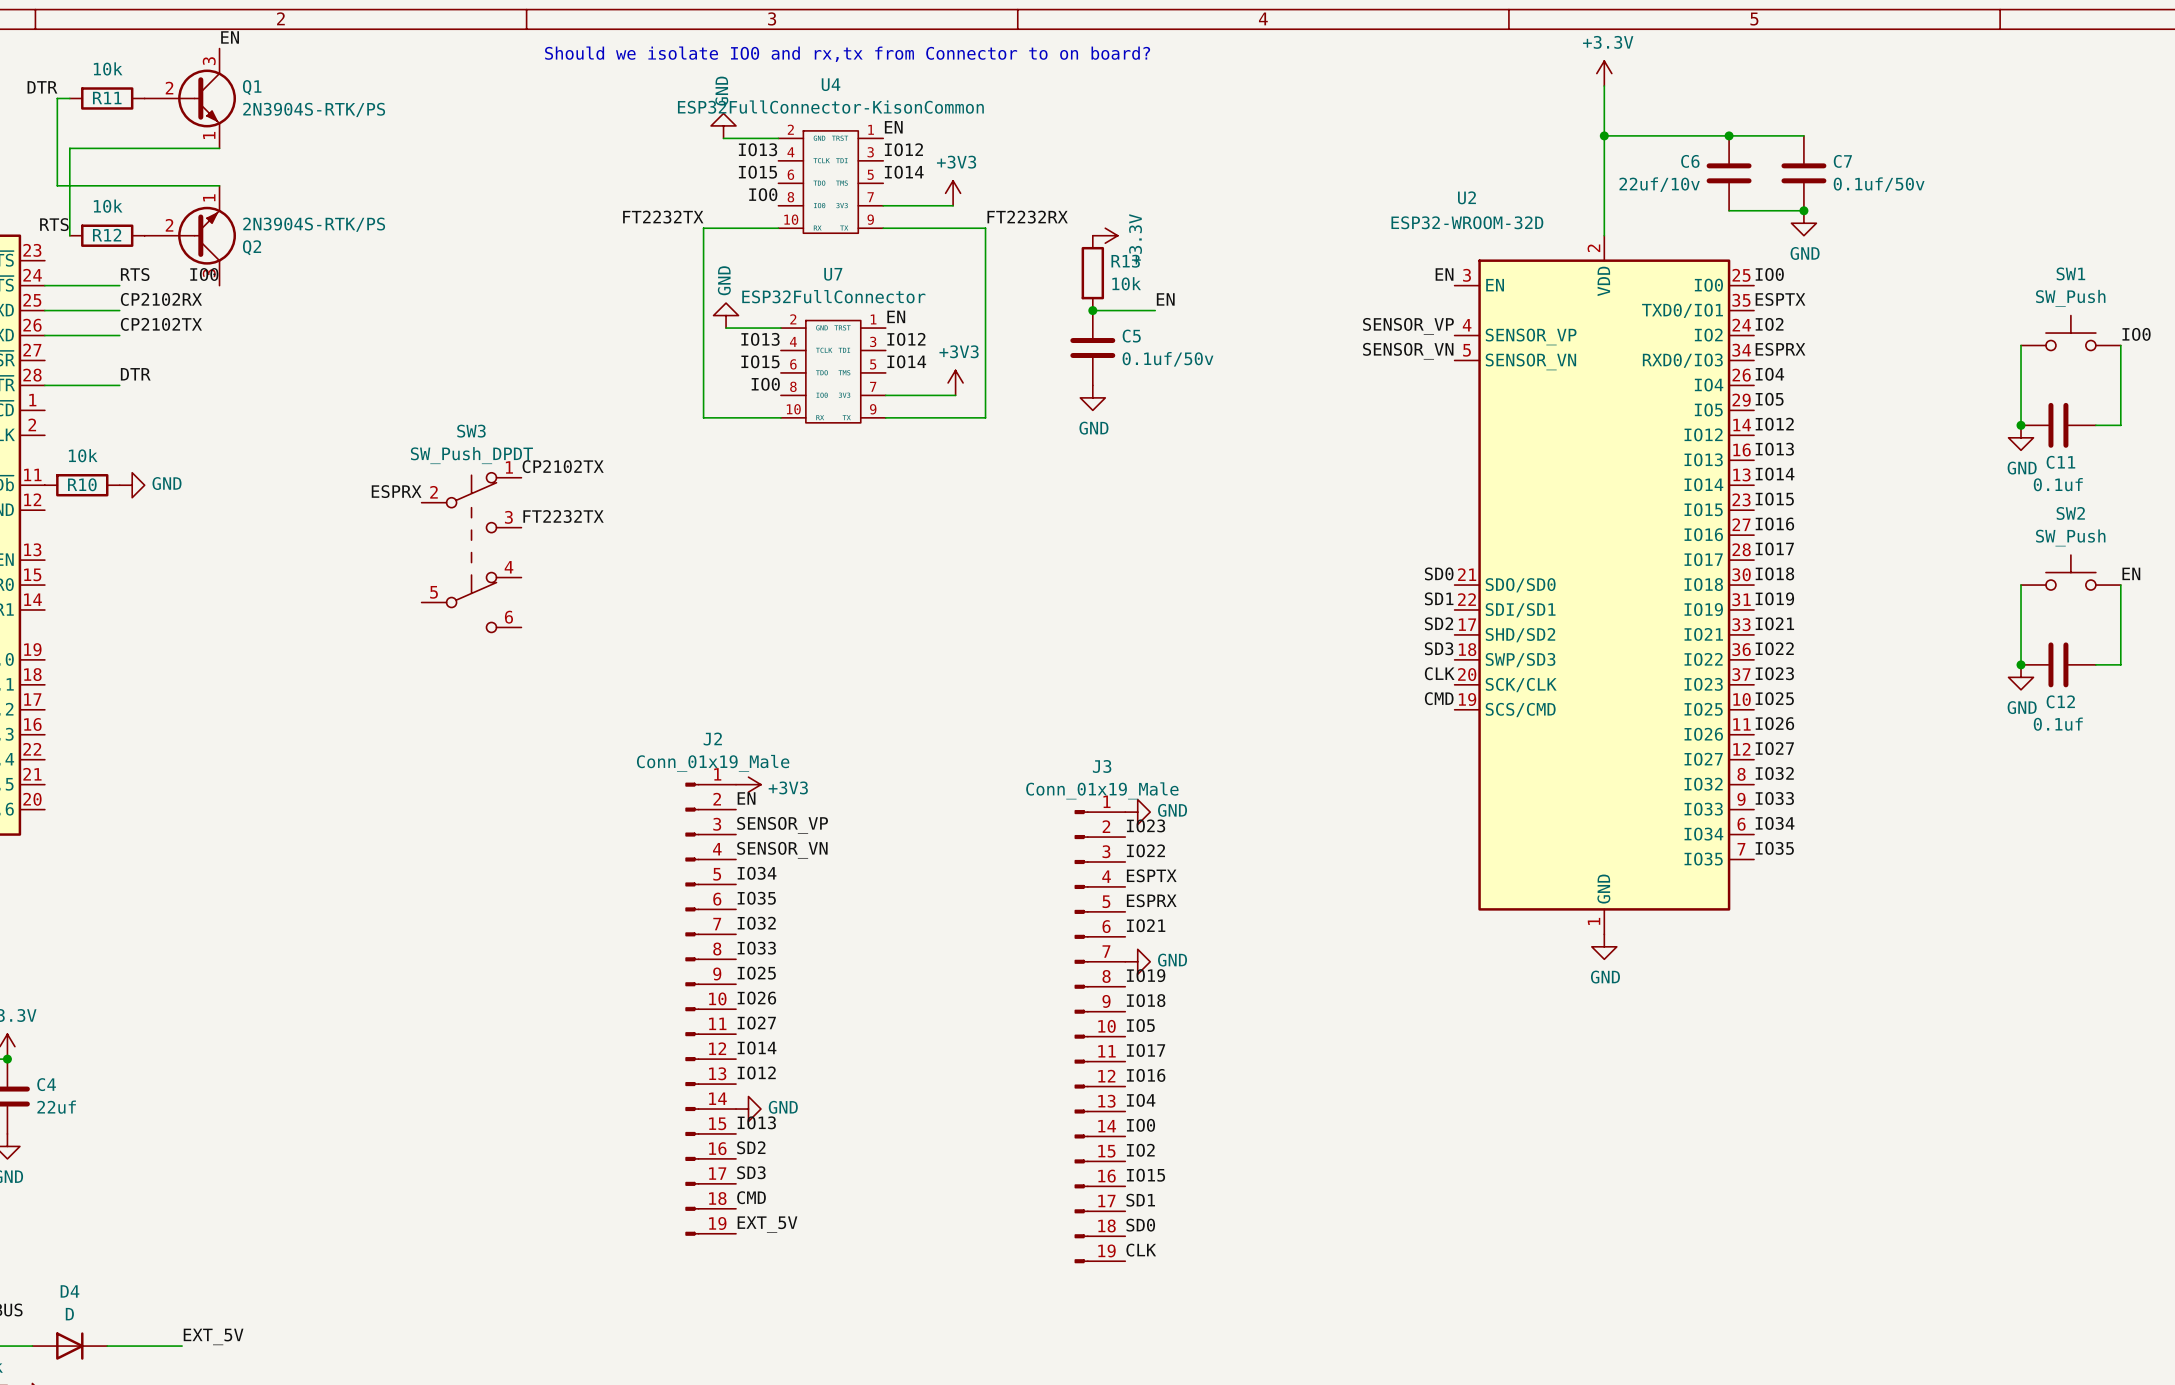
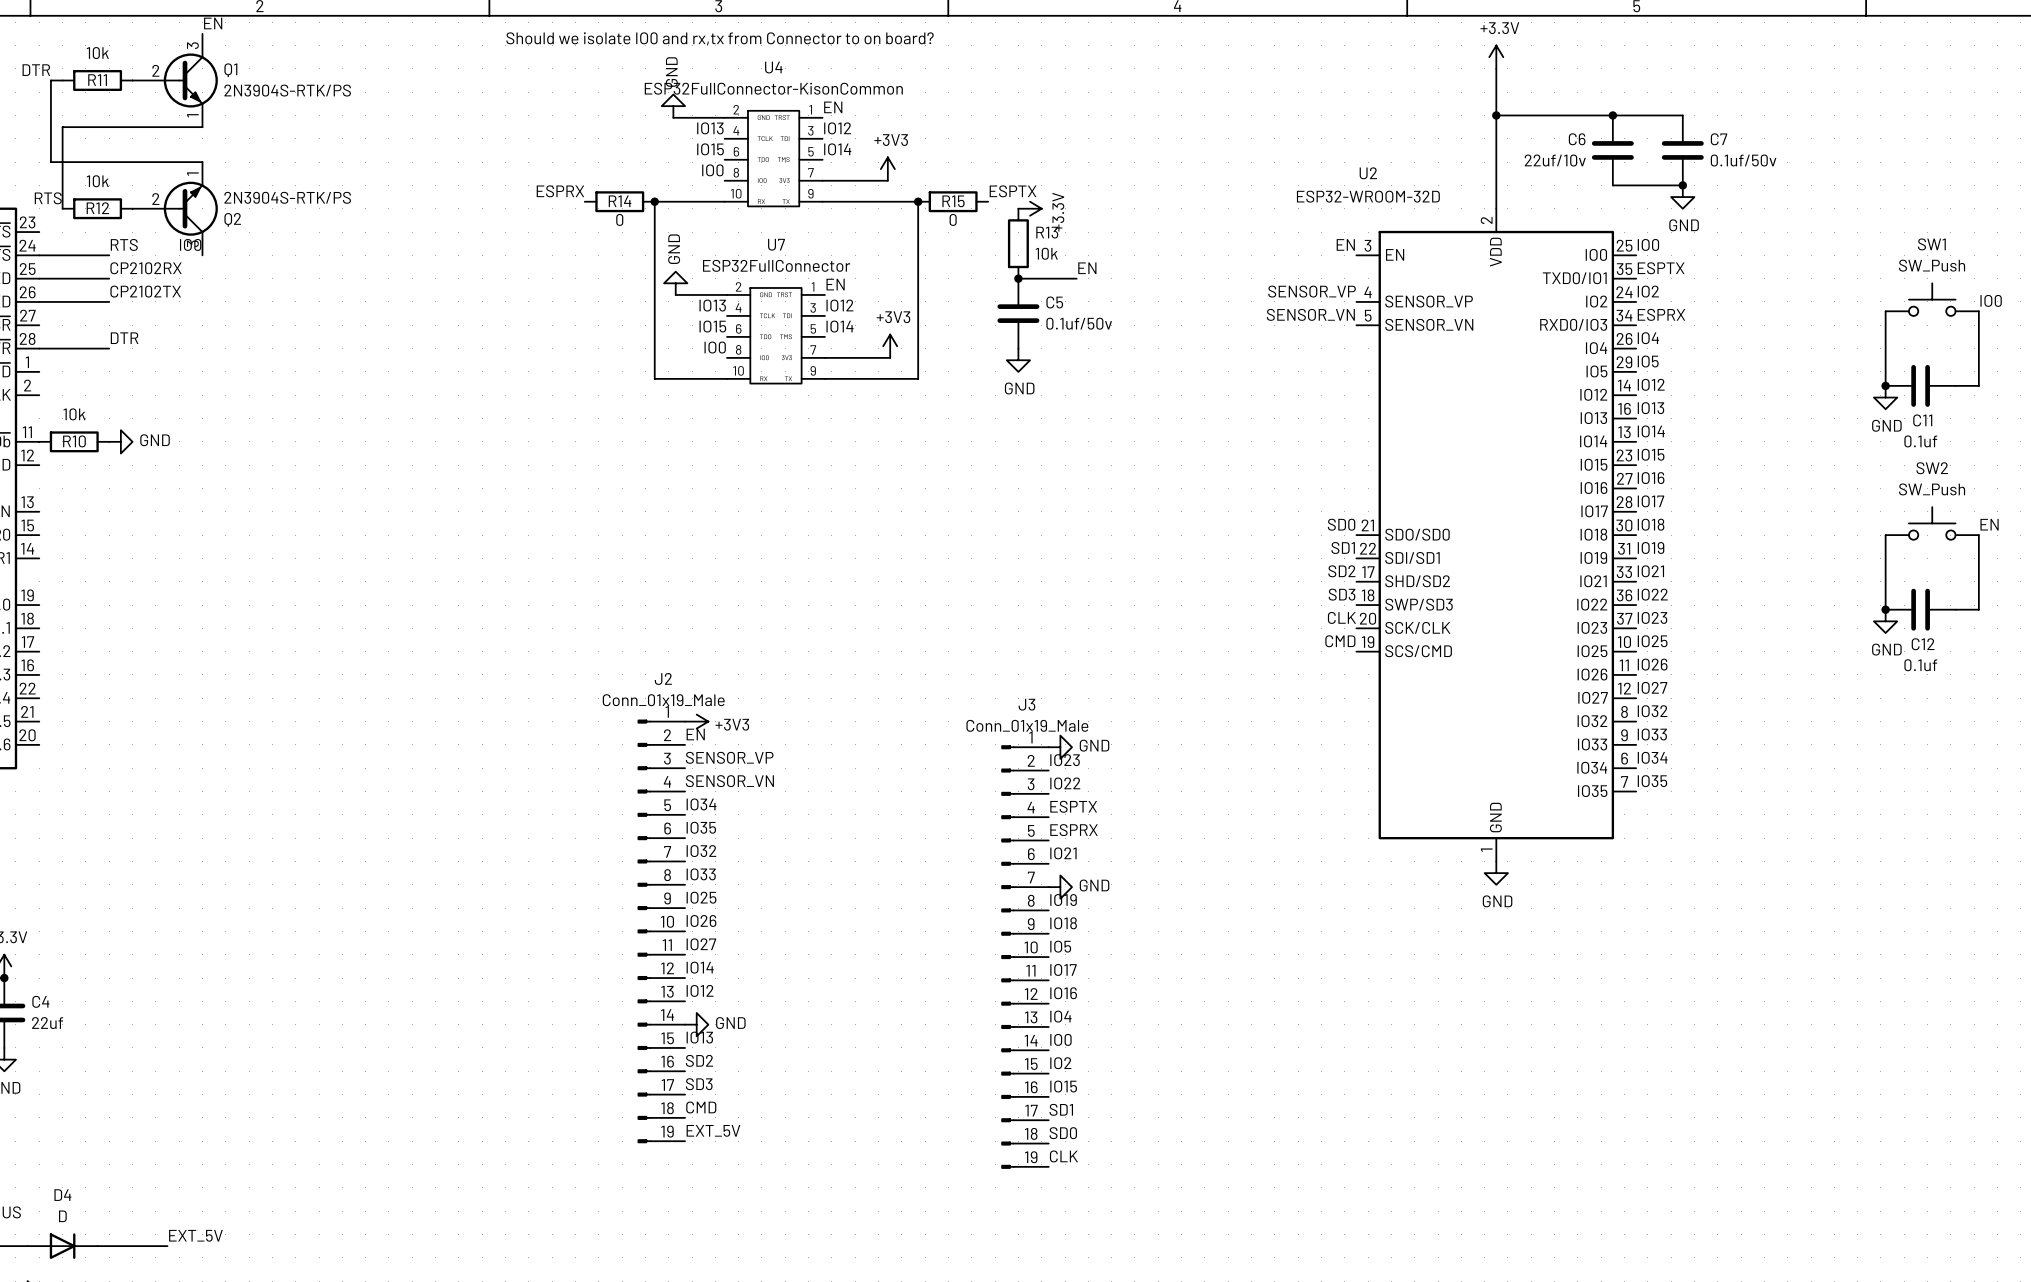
label: none -> ESPRX (560, 191)
label: FT2232TX (663, 217) -> none
label: FT2232RX (1027, 217) -> none
label: none -> ESPTX (1013, 191)
R14: none -> 0 (619, 201)
junction: none -> (654, 201)
junction: none -> (918, 201)
R15: none -> 0 (953, 201)
label: CP2102TX (563, 466) -> none
label: ESPRX (396, 491) -> none
label: FT2232TX (563, 516) -> none
SW3: SW_Push_DPDT (471, 552) -> none

